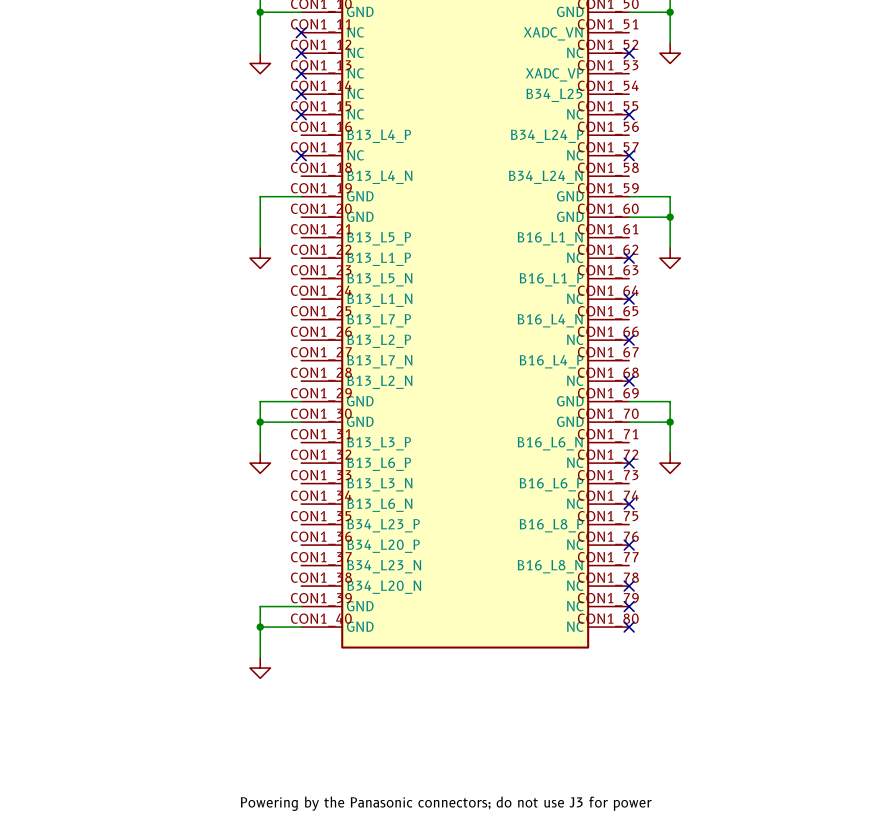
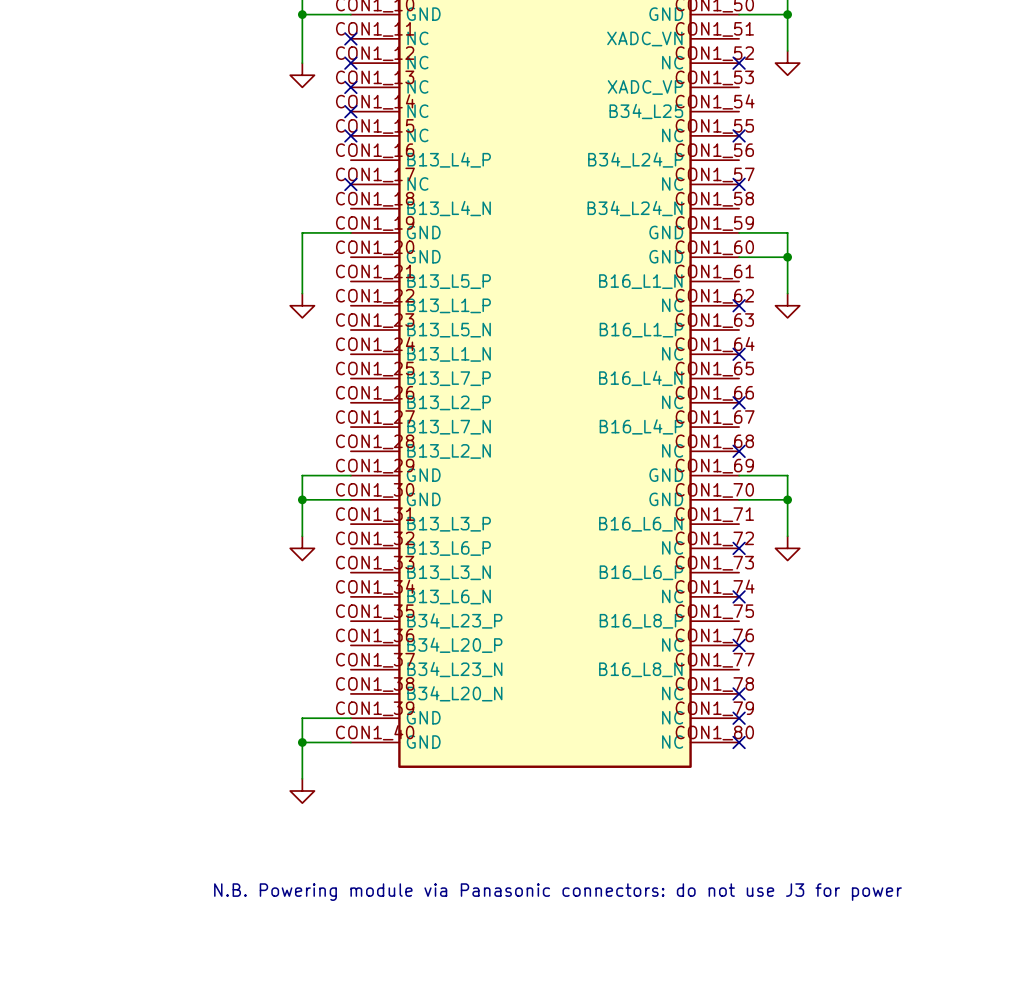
text: none -> N.B. Powering module via Panasonic connectors: do not use J3 for power (557, 892)
label: Powering by the Panasonic connectors; do not use J3 for power (446, 803) -> none

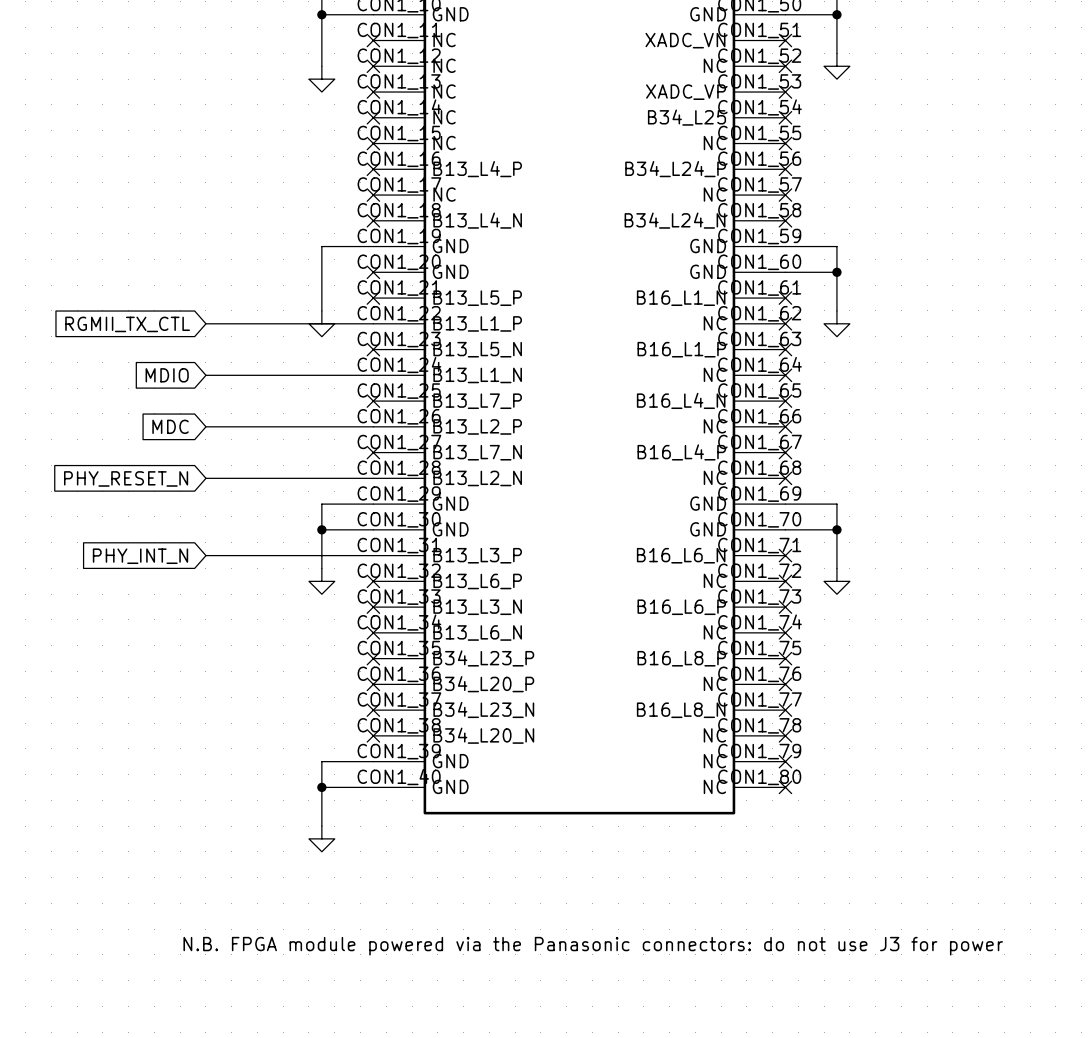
no-connect mark: none -> (785, 40)
no-connect mark: none -> (785, 92)
no-connect mark: none -> (785, 117)
no-connect mark: none -> (373, 169)
no-connect mark: none -> (785, 169)
no-connect mark: none -> (373, 220)
no-connect mark: none -> (785, 220)
no-connect mark: none -> (373, 272)
no-connect mark: none -> (373, 298)
no-connect mark: none -> (785, 298)
wire: none -> (205, 323) (373, 323)
global label: none -> RGMII_TX_CTL (127, 324)
no-connect mark: none -> (373, 349)
no-connect mark: none -> (785, 349)
global label: none -> MDIO (167, 375)
wire: none -> (205, 375) (373, 375)
no-connect mark: none -> (373, 401)
no-connect mark: none -> (785, 401)
global label: none -> MDC (170, 426)
wire: none -> (205, 426) (373, 426)
no-connect mark: none -> (373, 452)
no-connect mark: none -> (785, 452)
global label: none -> PHY_RESET_N (126, 478)
wire: none -> (205, 478) (373, 478)
global label: none -> PHY_INT_N (140, 556)
wire: none -> (205, 555) (373, 555)
no-connect mark: none -> (785, 555)
no-connect mark: none -> (373, 581)
no-connect mark: none -> (373, 607)
no-connect mark: none -> (785, 607)
no-connect mark: none -> (373, 632)
no-connect mark: none -> (373, 658)
no-connect mark: none -> (785, 658)
no-connect mark: none -> (373, 684)
no-connect mark: none -> (373, 710)
no-connect mark: none -> (785, 710)
no-connect mark: none -> (373, 735)
text: N.B. Powering module via Panasonic connectors: do not use J3 for power (557, 892) -> N.B. FPGA module powered via the Panasonic connectors: do not use J3 for power (593, 946)

